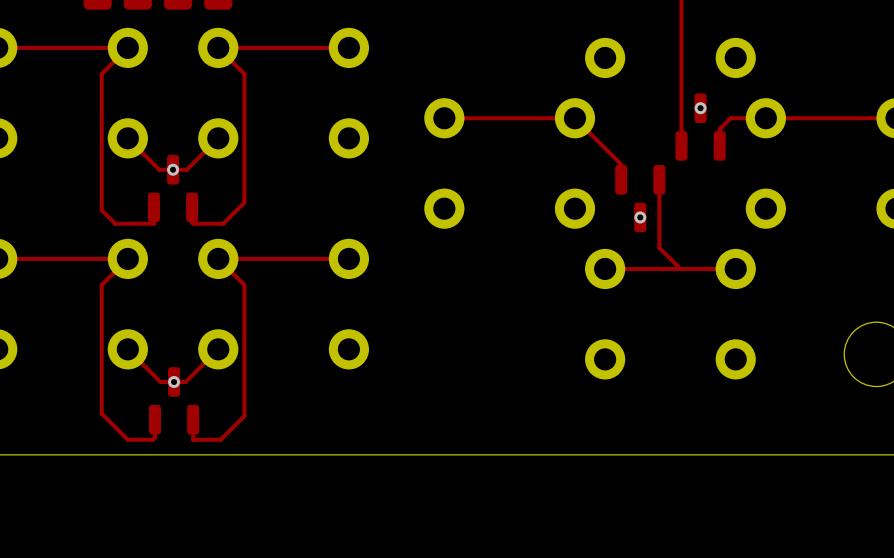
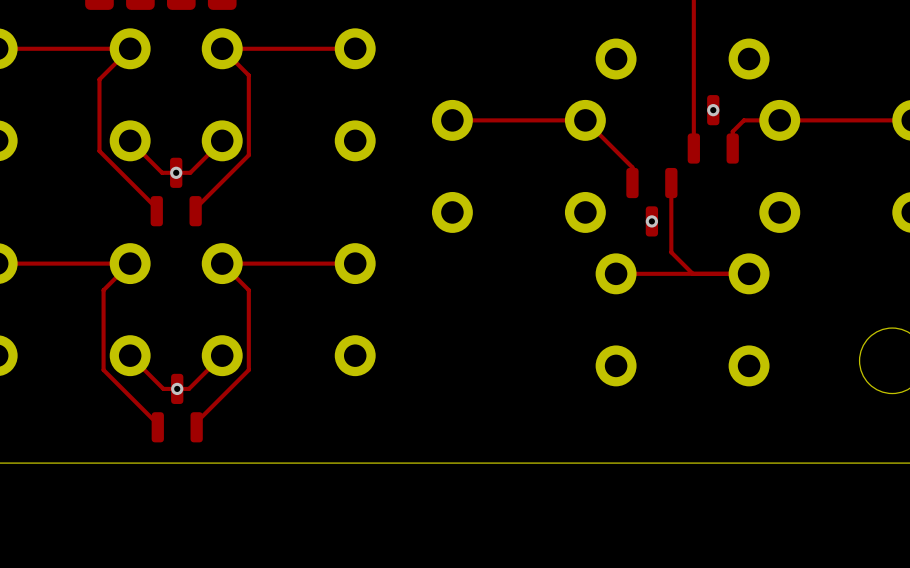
top track: (101, 74) (101, 210) (115, 223) (153, 223) (153, 207) -> (103, 75) (99, 79) (99, 151) (156, 208) (156, 211)
top track: (244, 152) (244, 202) (223, 223) (193, 223) (192, 207) -> (248, 155) (195, 208) (195, 211)
top track: (101, 363) (101, 413) (127, 439) (152, 439) (154, 437) (154, 419) -> (103, 369) (155, 422)
top track: (244, 363) (244, 416) (220, 439) (193, 439) (193, 419) -> (248, 369) (196, 422)

